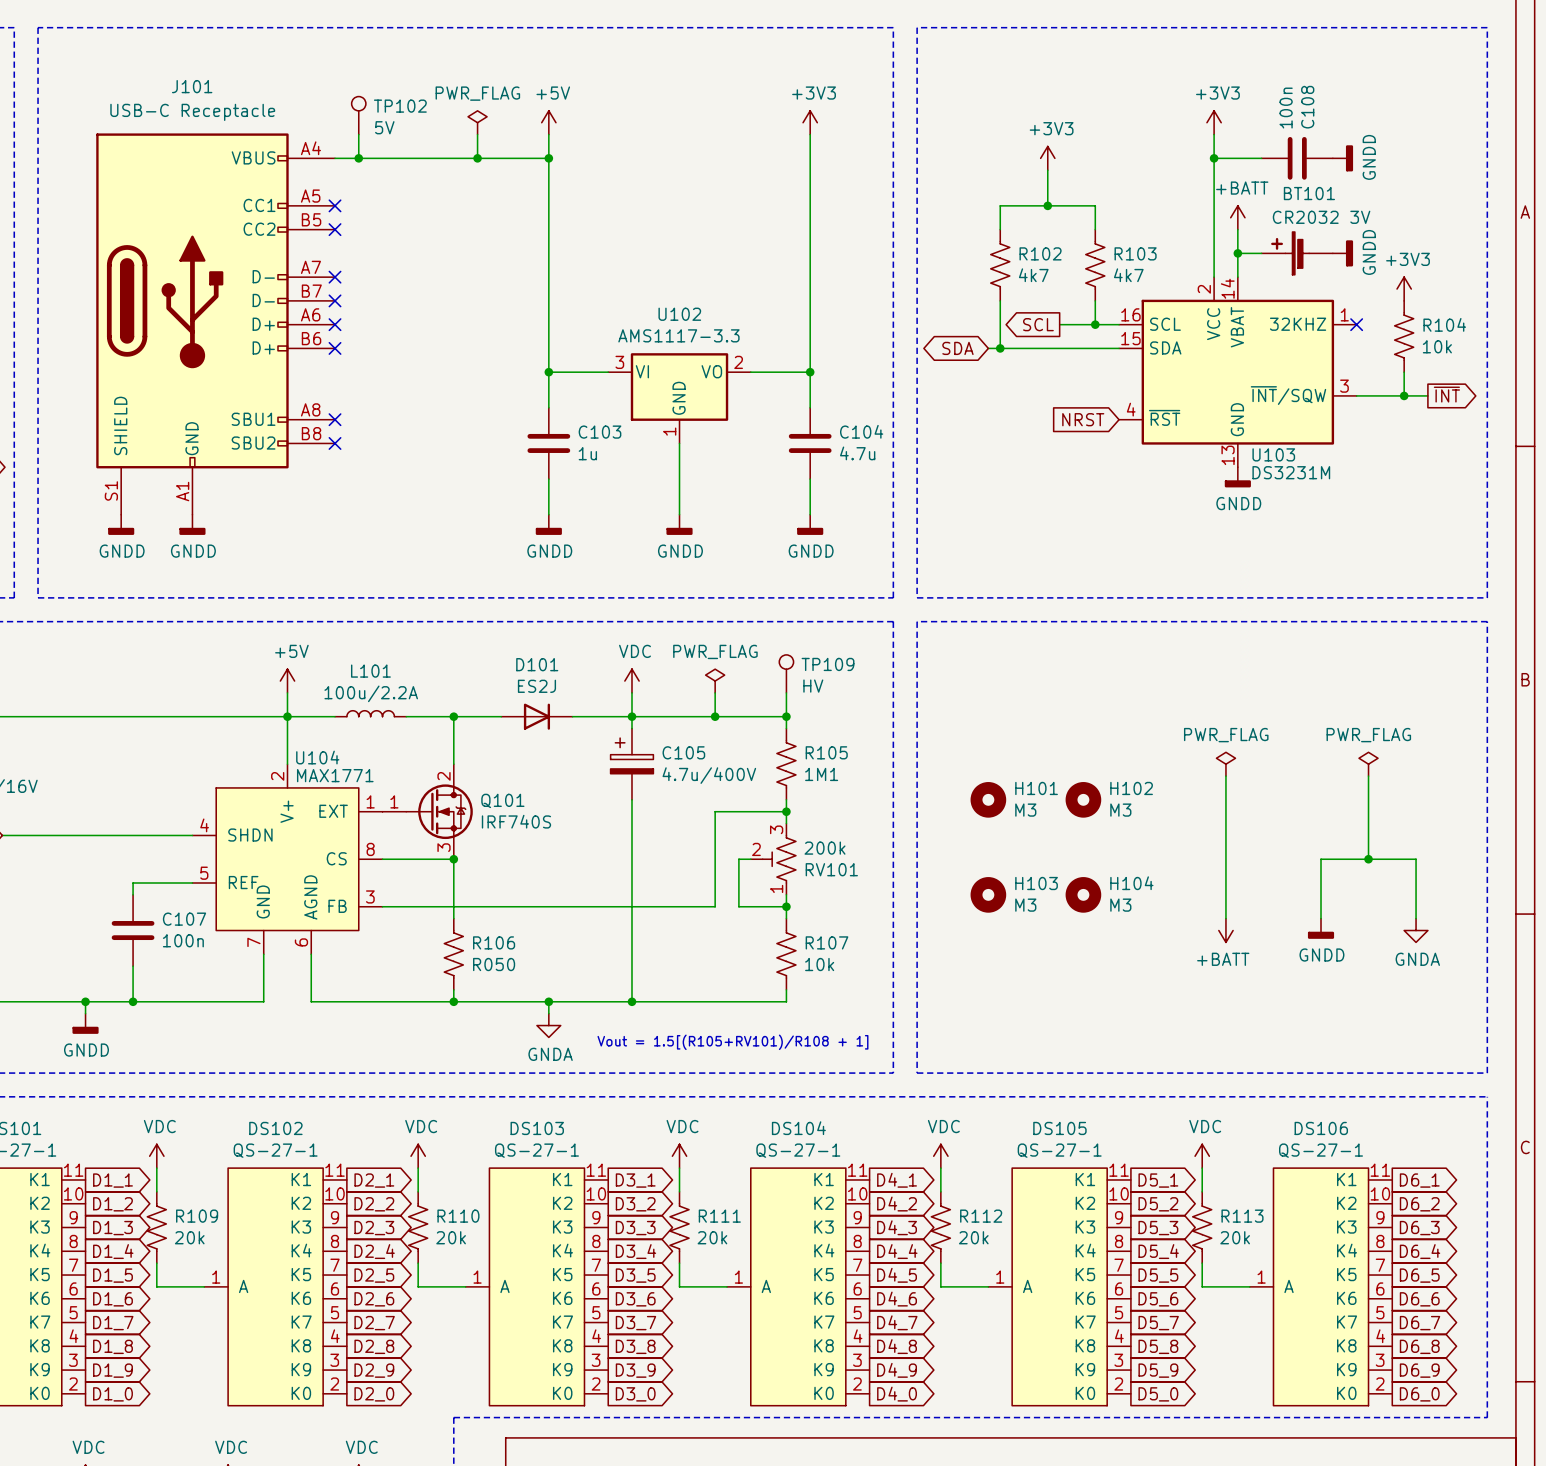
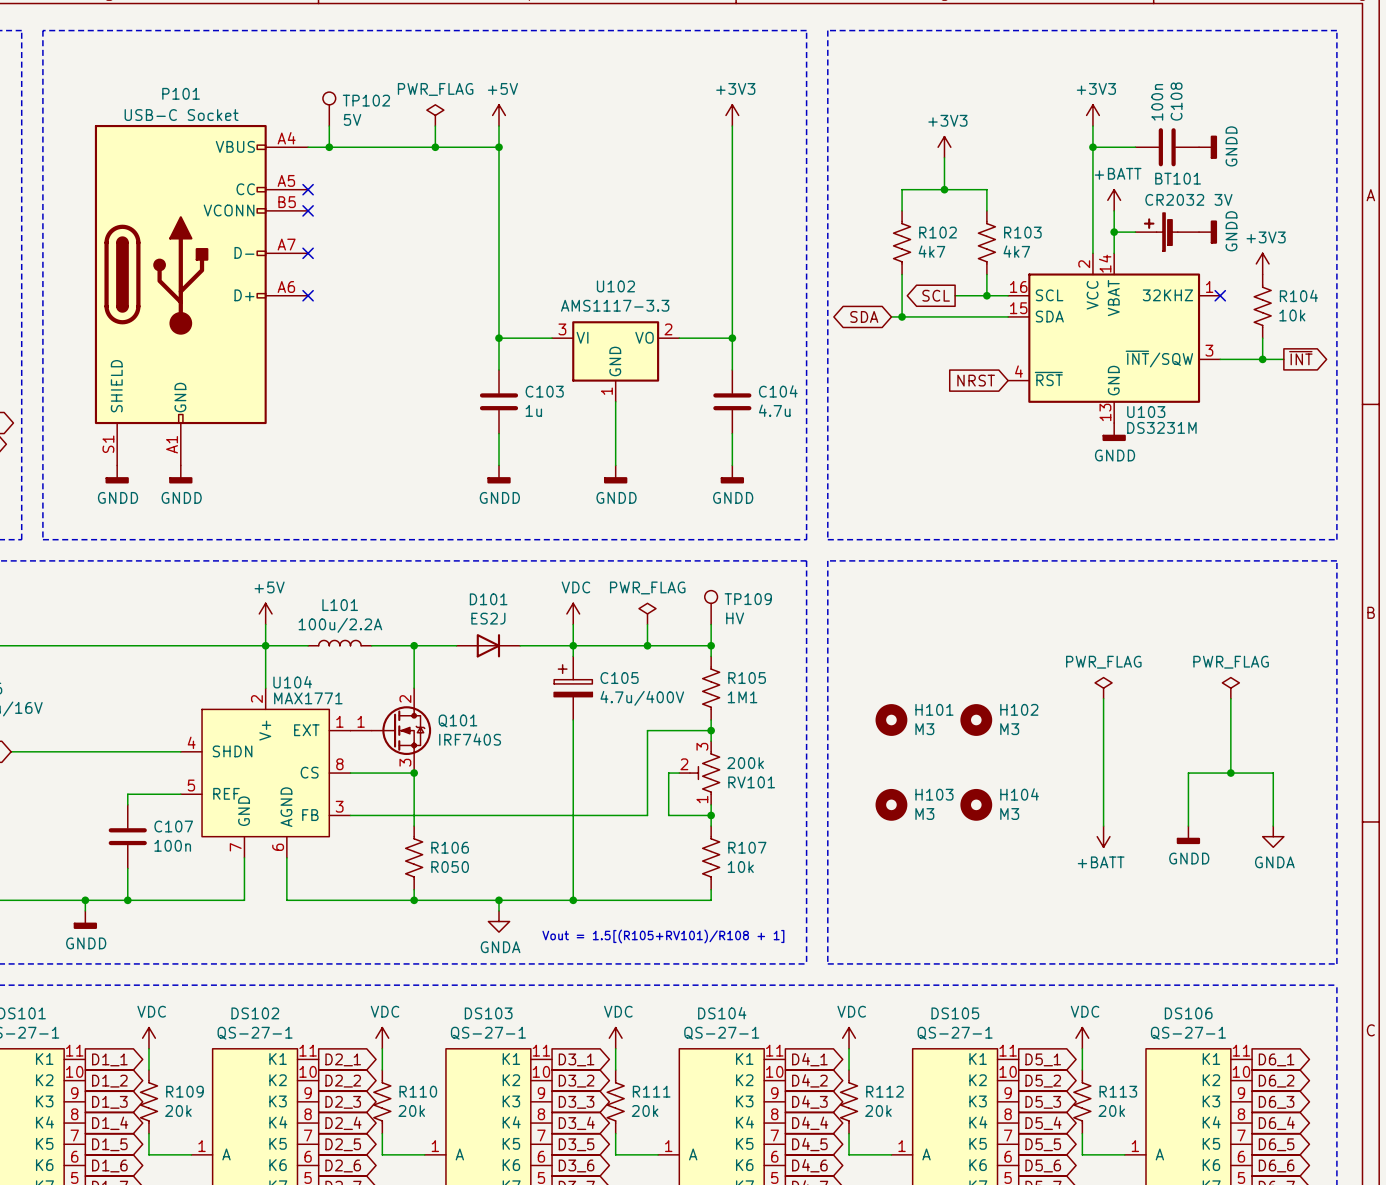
no-connect mark: (335, 300) -> none
J101: USB-C Receptacle (215, 324) -> none
P101: none -> USB-C Socket (201, 295)
no-connect mark: (335, 348) -> none
no-connect mark: (335, 419) -> none
no-connect mark: (335, 443) -> none

